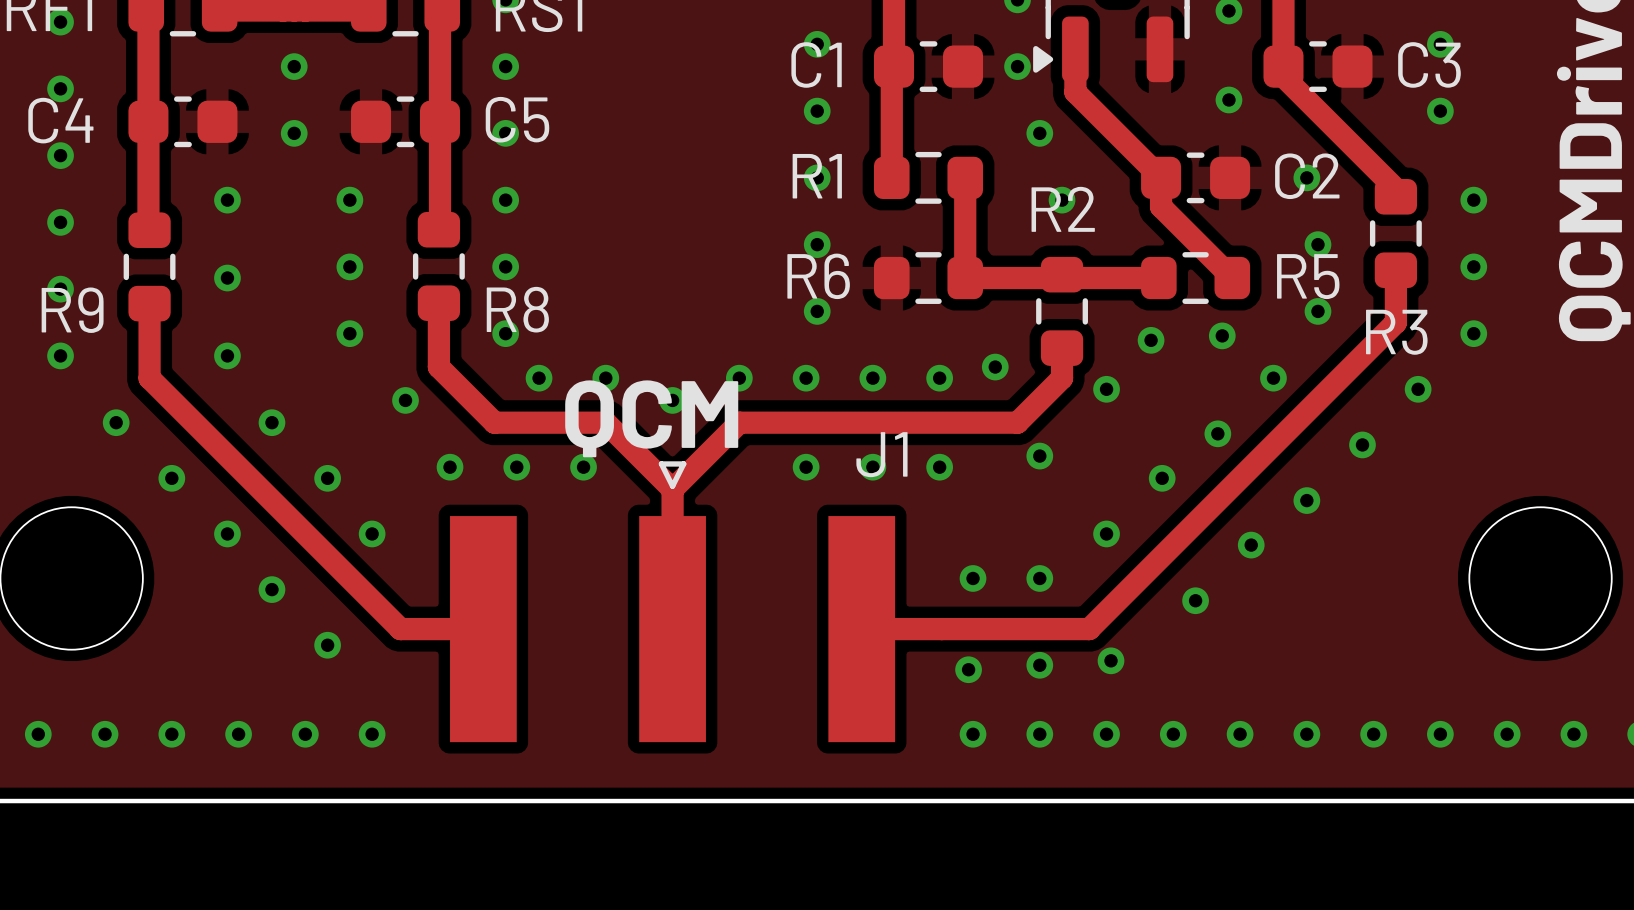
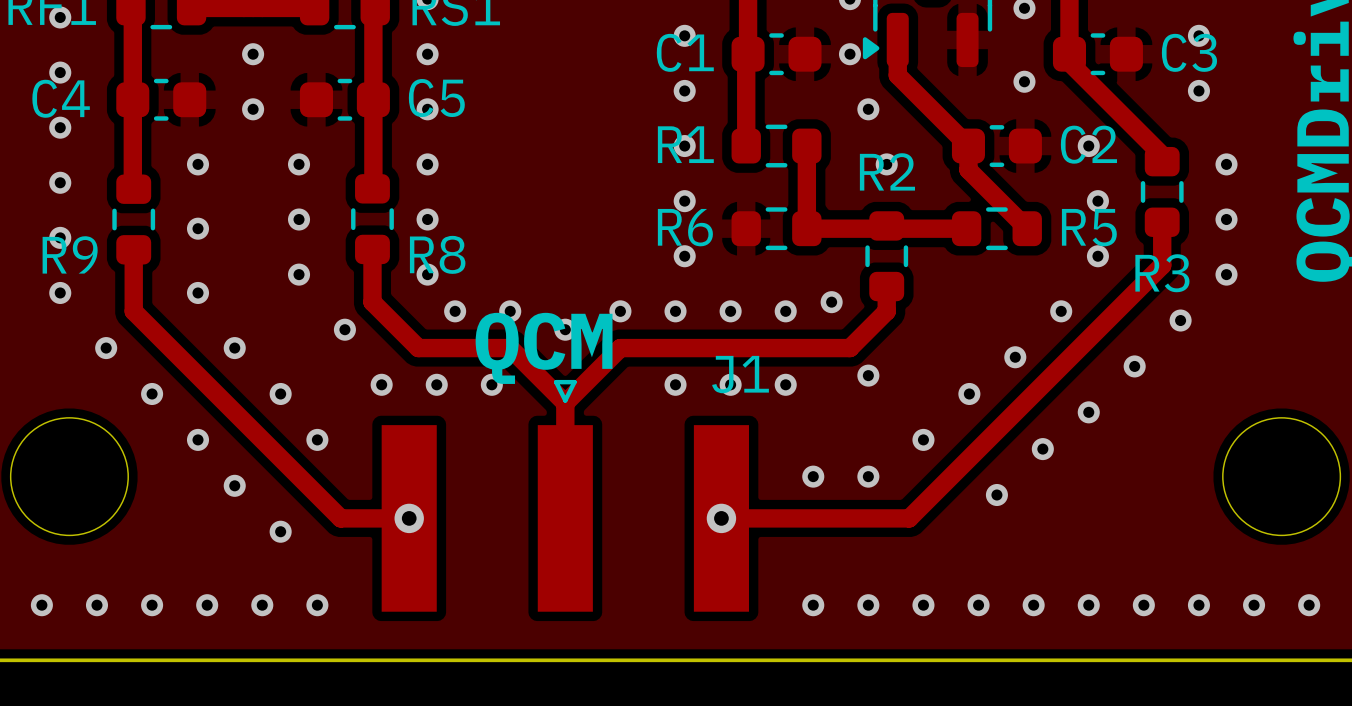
via: (1222, 335) -> none
via: (1151, 340) -> none
via: (1106, 389) -> none
via: none -> (409, 518)
via: none -> (721, 518)
via: (1111, 660) -> none
via: (1039, 665) -> none
via: (968, 669) -> none

